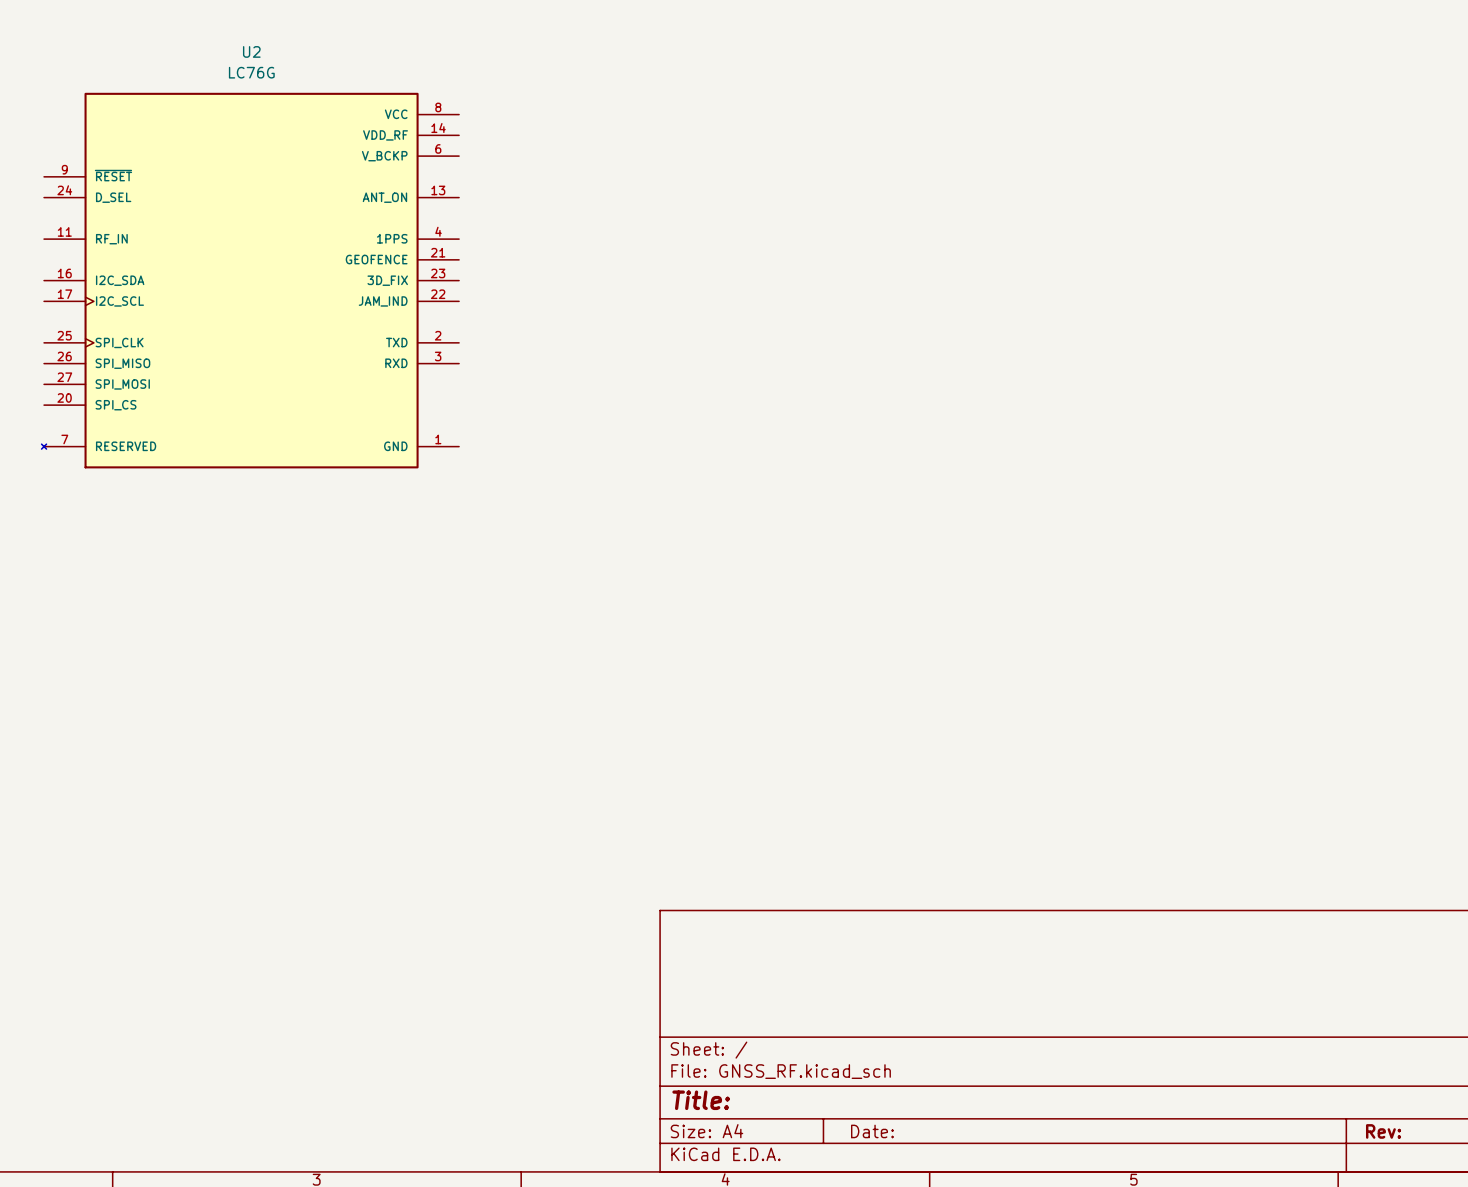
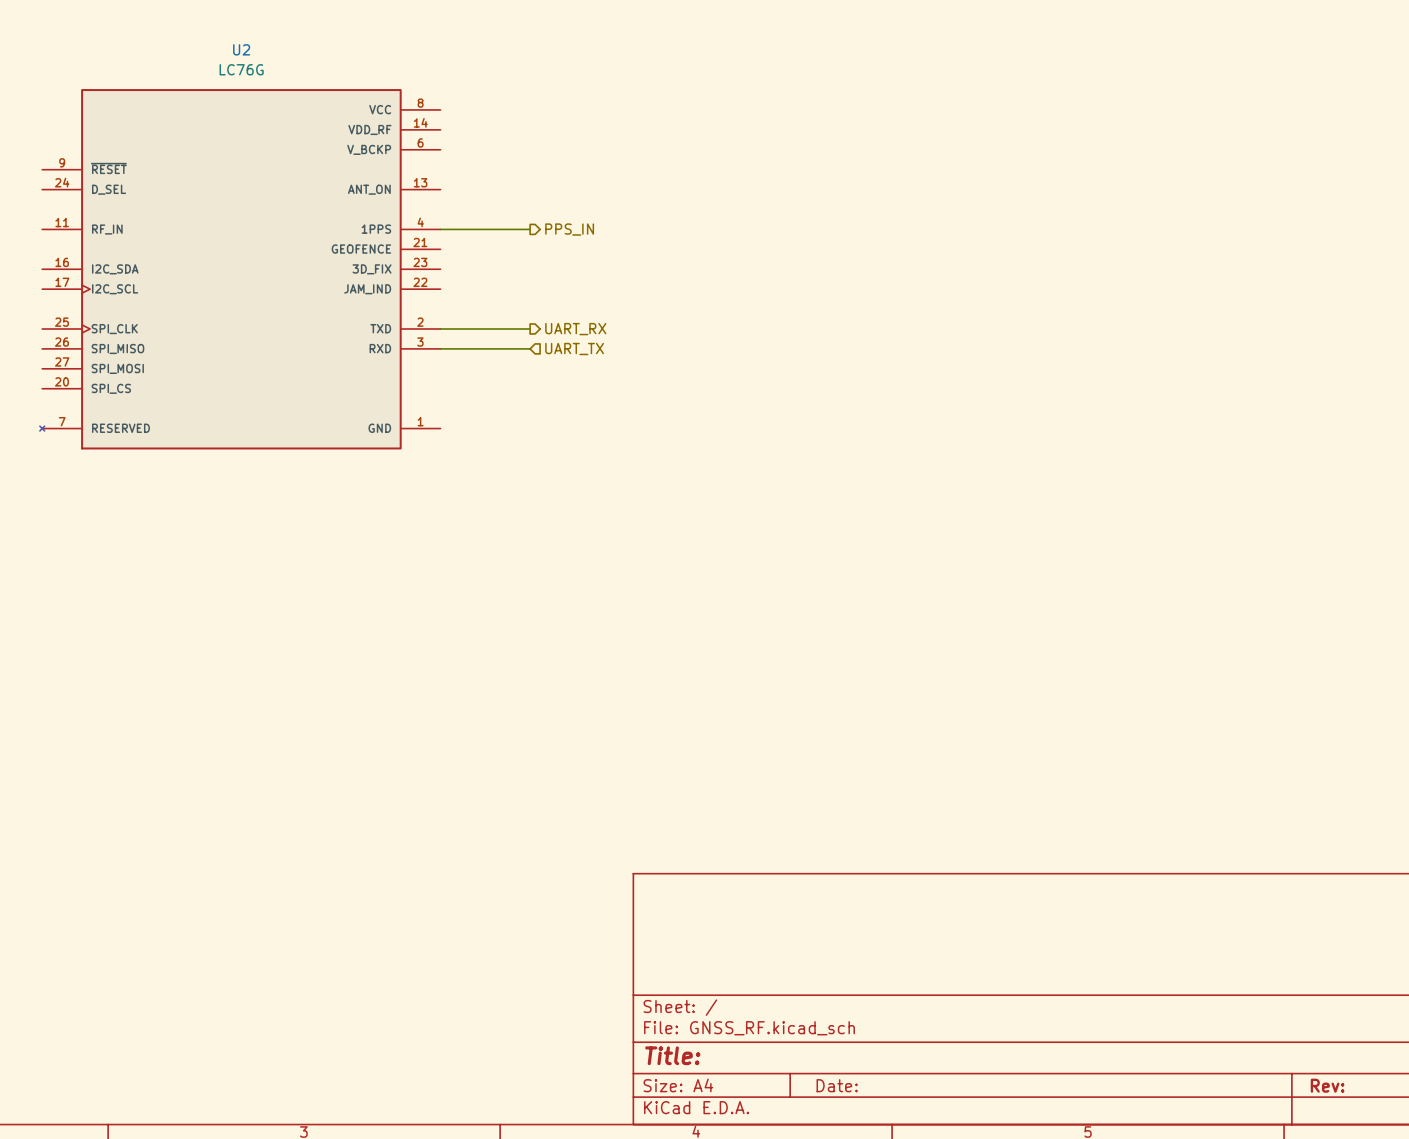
wire: none -> (440, 229) (530, 229)
hierarchical label: none -> PPS_IN (569, 229)
wire: none -> (440, 328) (530, 328)
hierarchical label: none -> UART_RX (575, 329)
wire: none -> (440, 348) (530, 348)
hierarchical label: none -> UART_TX (574, 349)

